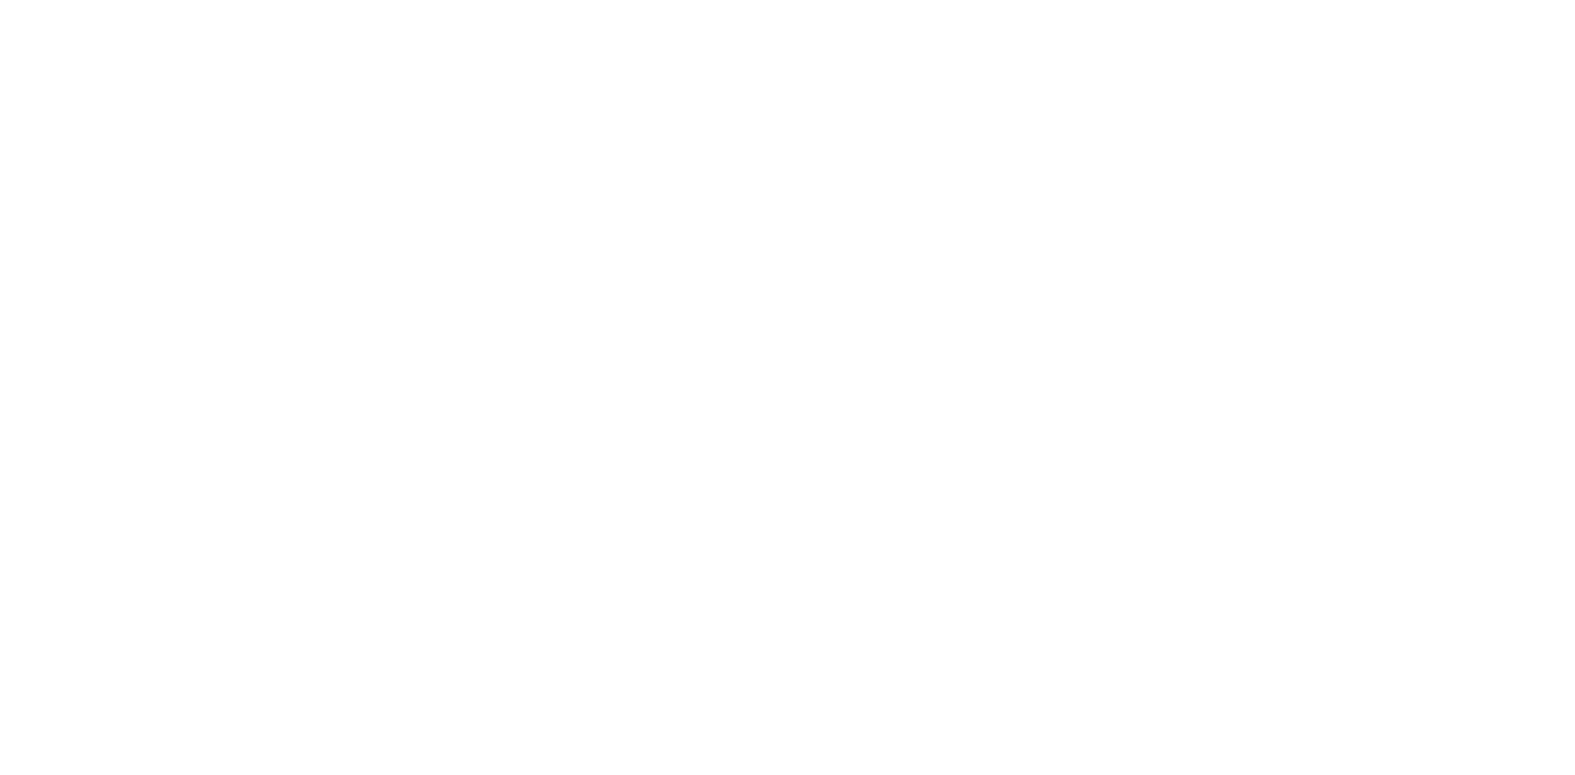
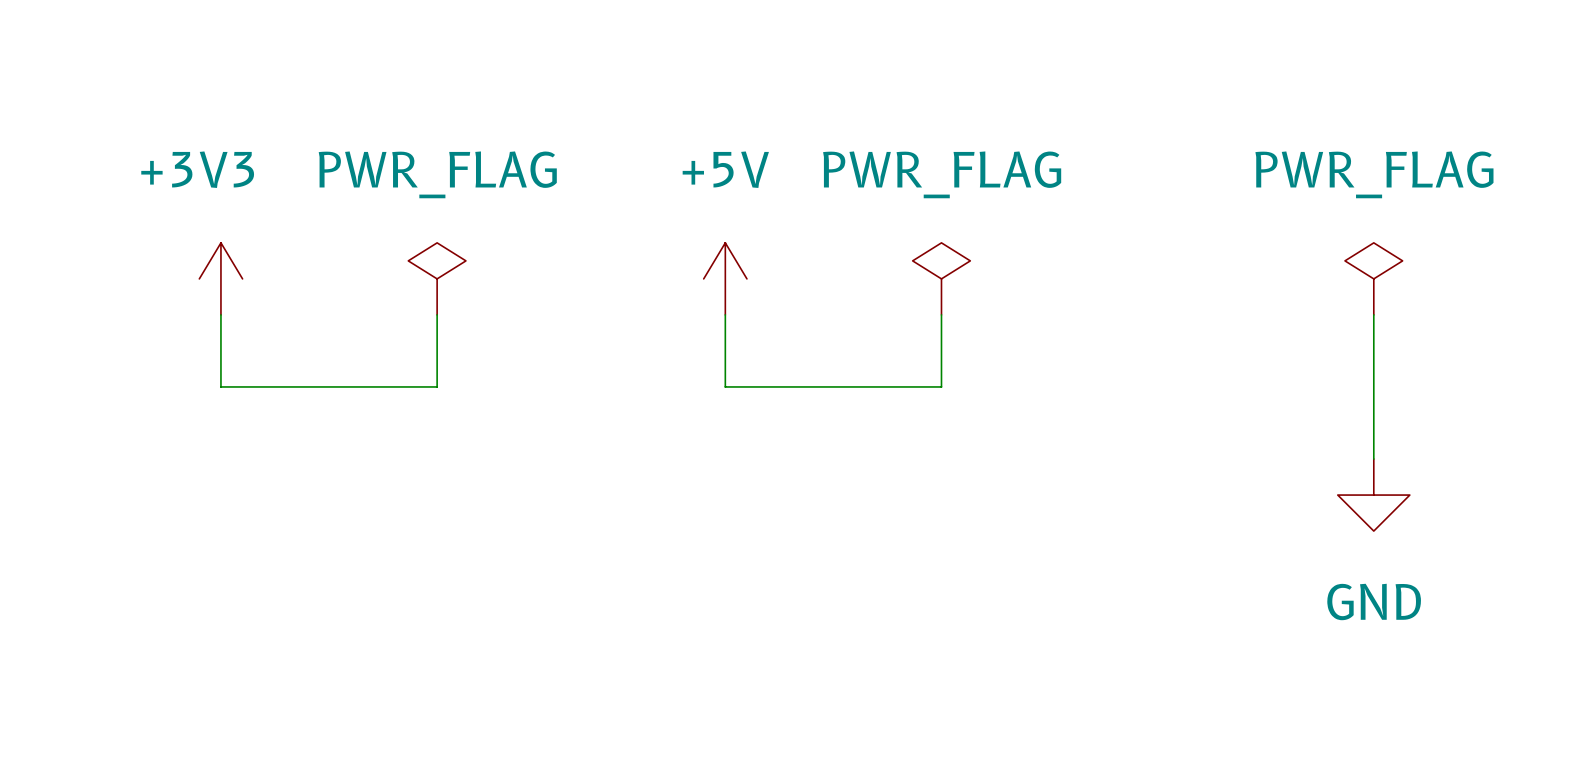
power symbol: none -> +3V3 (220, 278)
power symbol: none -> PWR_FLAG (437, 278)
power symbol: none -> +5V (725, 278)
power symbol: none -> PWR_FLAG (941, 278)
power symbol: none -> PWR_FLAG (1373, 278)
wire: none -> (220, 314) (220, 386) (437, 386) (437, 314)
wire: none -> (725, 314) (725, 386) (941, 386) (941, 314)
wire: none -> (1373, 314) (1373, 459)
power symbol: none -> GND (1373, 495)

